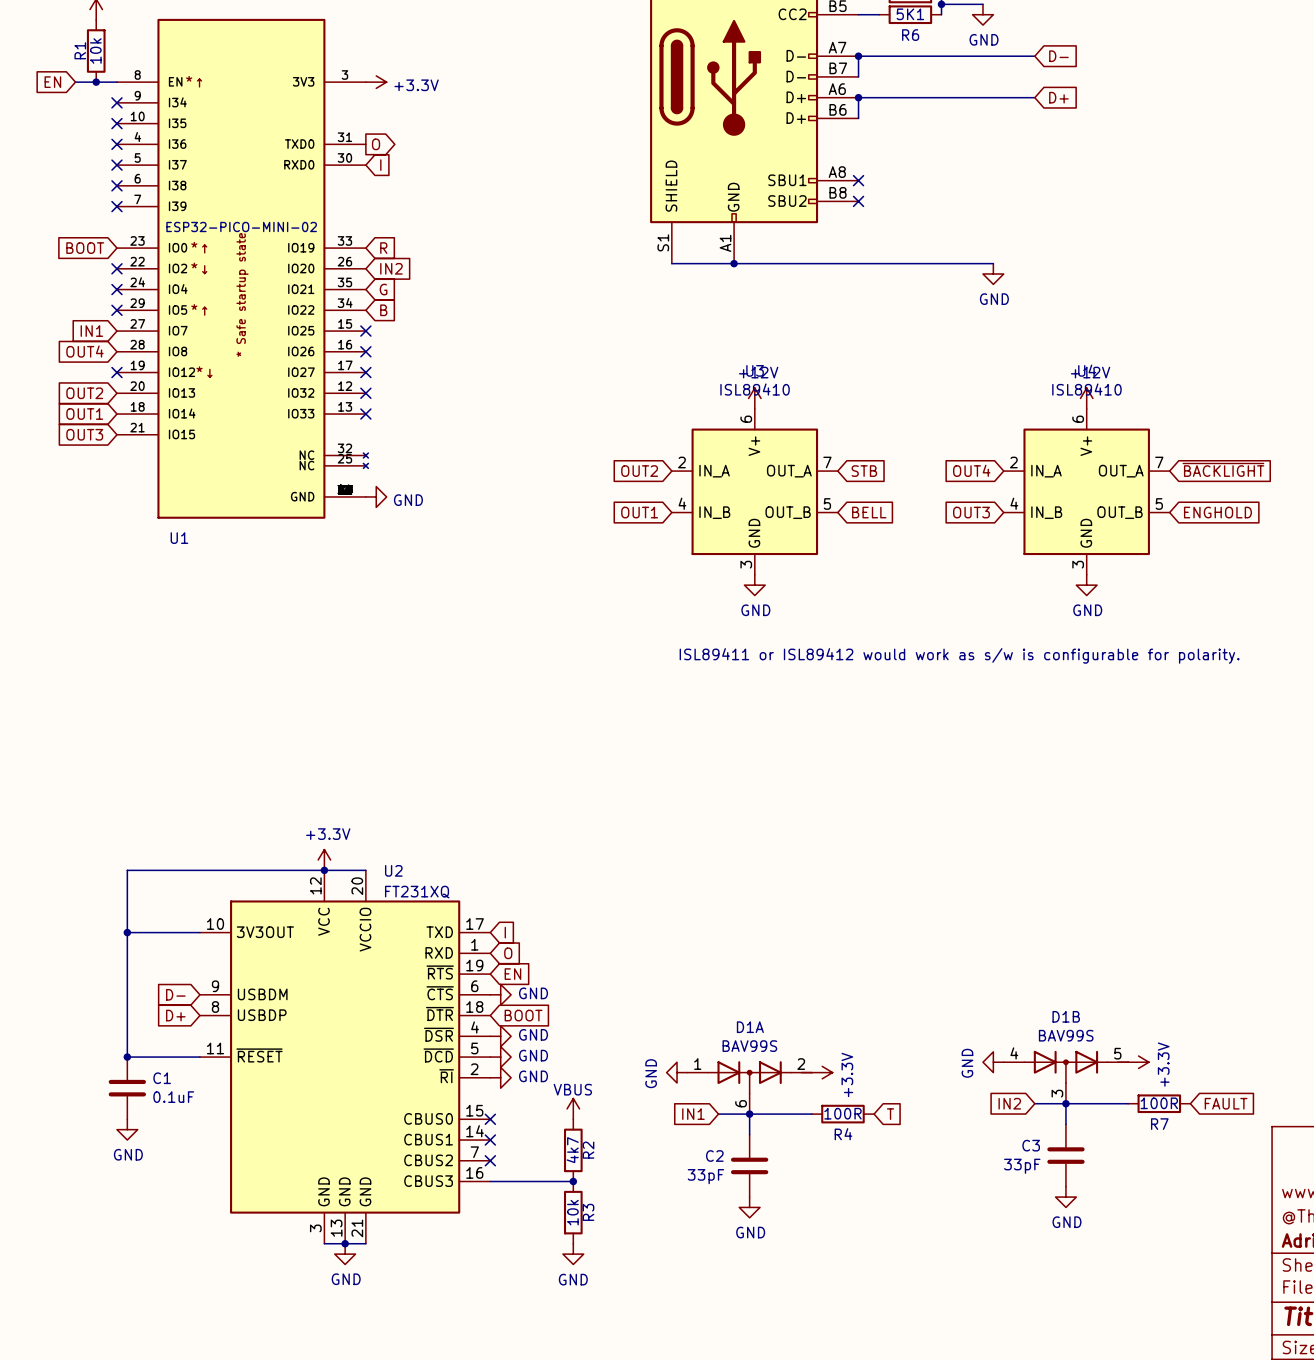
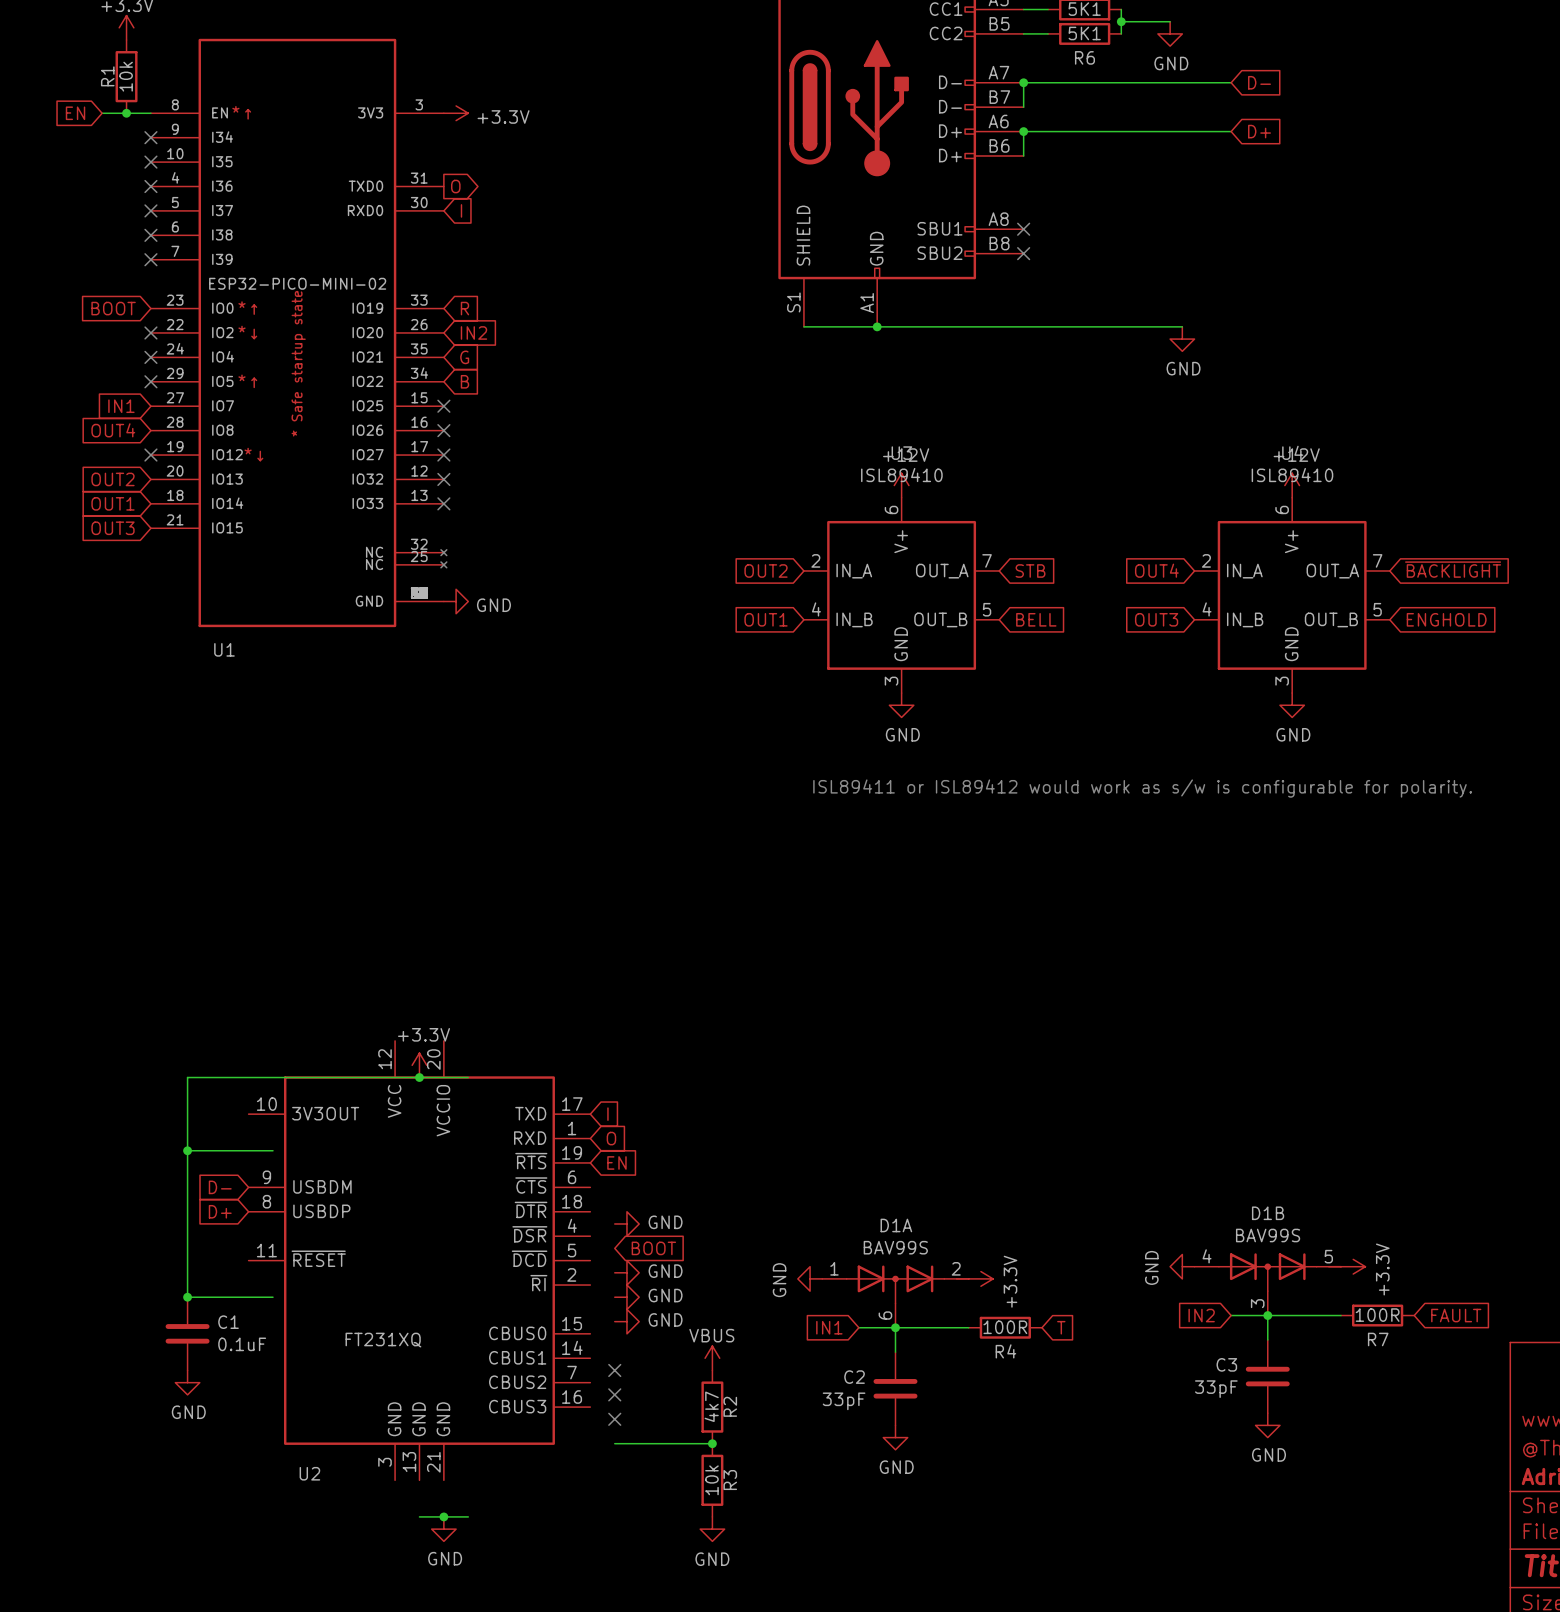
power symbol position: +3.3V (324, 859) -> +3.3V (419, 1065)
junction position: (324, 870) -> (419, 1077)
wire: (365, 870) (127, 870) (127, 1057) (199, 1057) -> (468, 1077) (187, 1077) (187, 1297) (273, 1297)
U2 name position: U2 (393, 870) -> U2 (309, 1473)
U2 value position: FT231XQ (417, 892) -> FT231XQ (383, 1340)
wire: (127, 932) (199, 932) -> (187, 1150) (273, 1150)
junction position: (127, 932) -> (187, 1150)
power symbol: GND (500, 994) -> none
global label position: BOOT (523, 1015) -> BOOT (653, 1248)
power symbol: none -> GND (626, 1223)
power symbol: GND (500, 1036) -> none
junction position: (127, 1057) -> (187, 1297)
power symbol: GND (500, 1057) -> none
power symbol: none -> GND (626, 1272)
power symbol: GND (500, 1077) -> none
C1 position: (127, 1088) -> (187, 1333)
power symbol: none -> GND (626, 1297)
power symbol: none -> GND (626, 1321)
power symbol position: VBUS (573, 1108) -> VBUS (712, 1358)
no-connect mark: (490, 1119) -> none
power symbol position: GND (127, 1129) -> GND (187, 1382)
no-connect mark: (490, 1140) -> none
no-connect mark: none -> (614, 1370)
R2 position: (573, 1150) -> (712, 1407)
no-connect mark: (490, 1160) -> none
no-connect mark: none -> (614, 1394)
wire: (490, 1181) (573, 1181) -> (614, 1443) (712, 1443)
junction position: (573, 1181) -> (712, 1443)
no-connect mark: none -> (614, 1419)
R3 position: (573, 1212) -> (712, 1480)
wire: (324, 1243) (365, 1243) -> (419, 1516) (468, 1516)
junction position: (345, 1243) -> (443, 1516)
power symbol position: GND (345, 1254) -> GND (443, 1529)
power symbol position: GND (573, 1254) -> GND (712, 1529)

